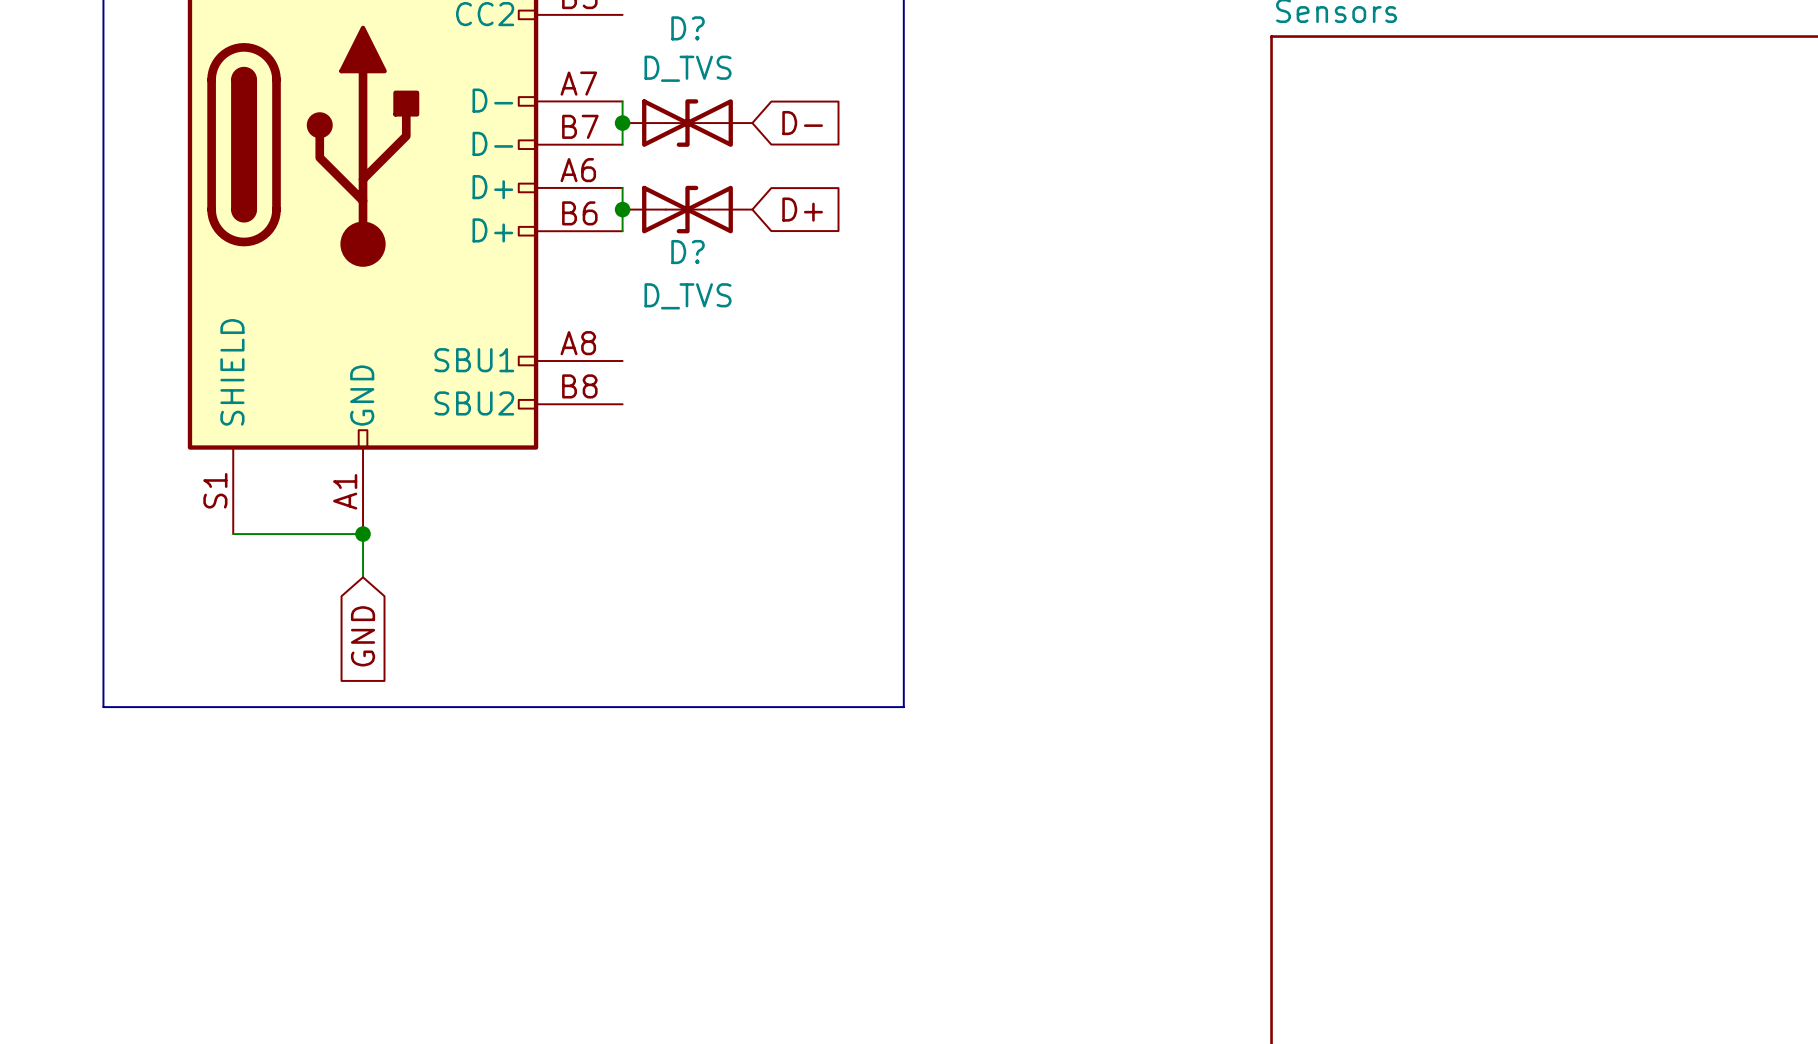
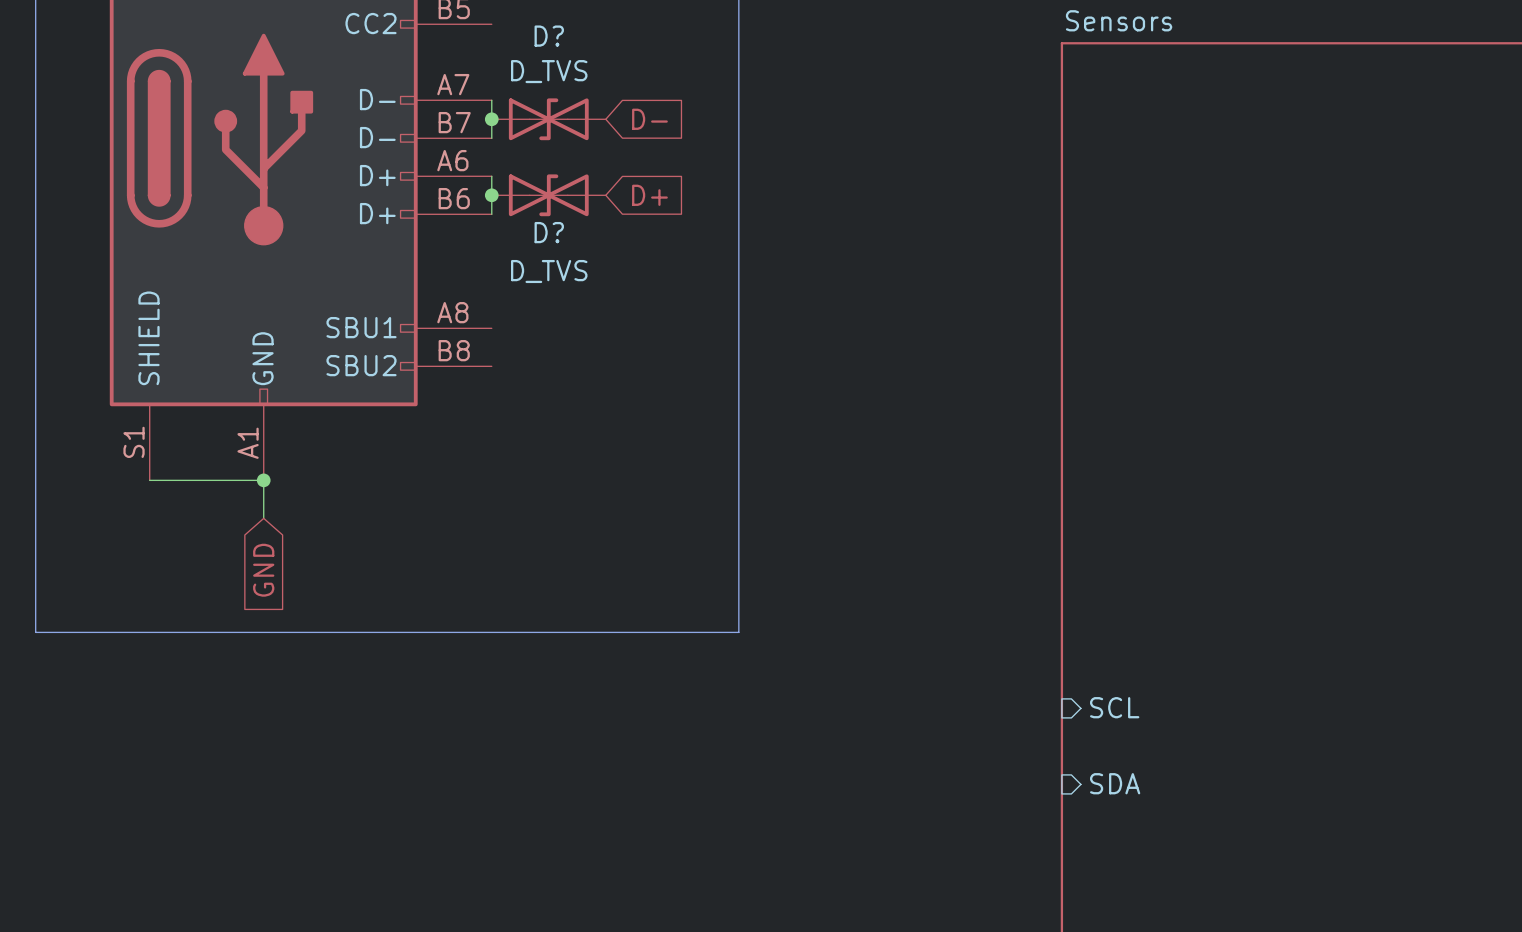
sheet pin: none -> SCL (1114, 707)
sheet pin: none -> SDA (1115, 783)

